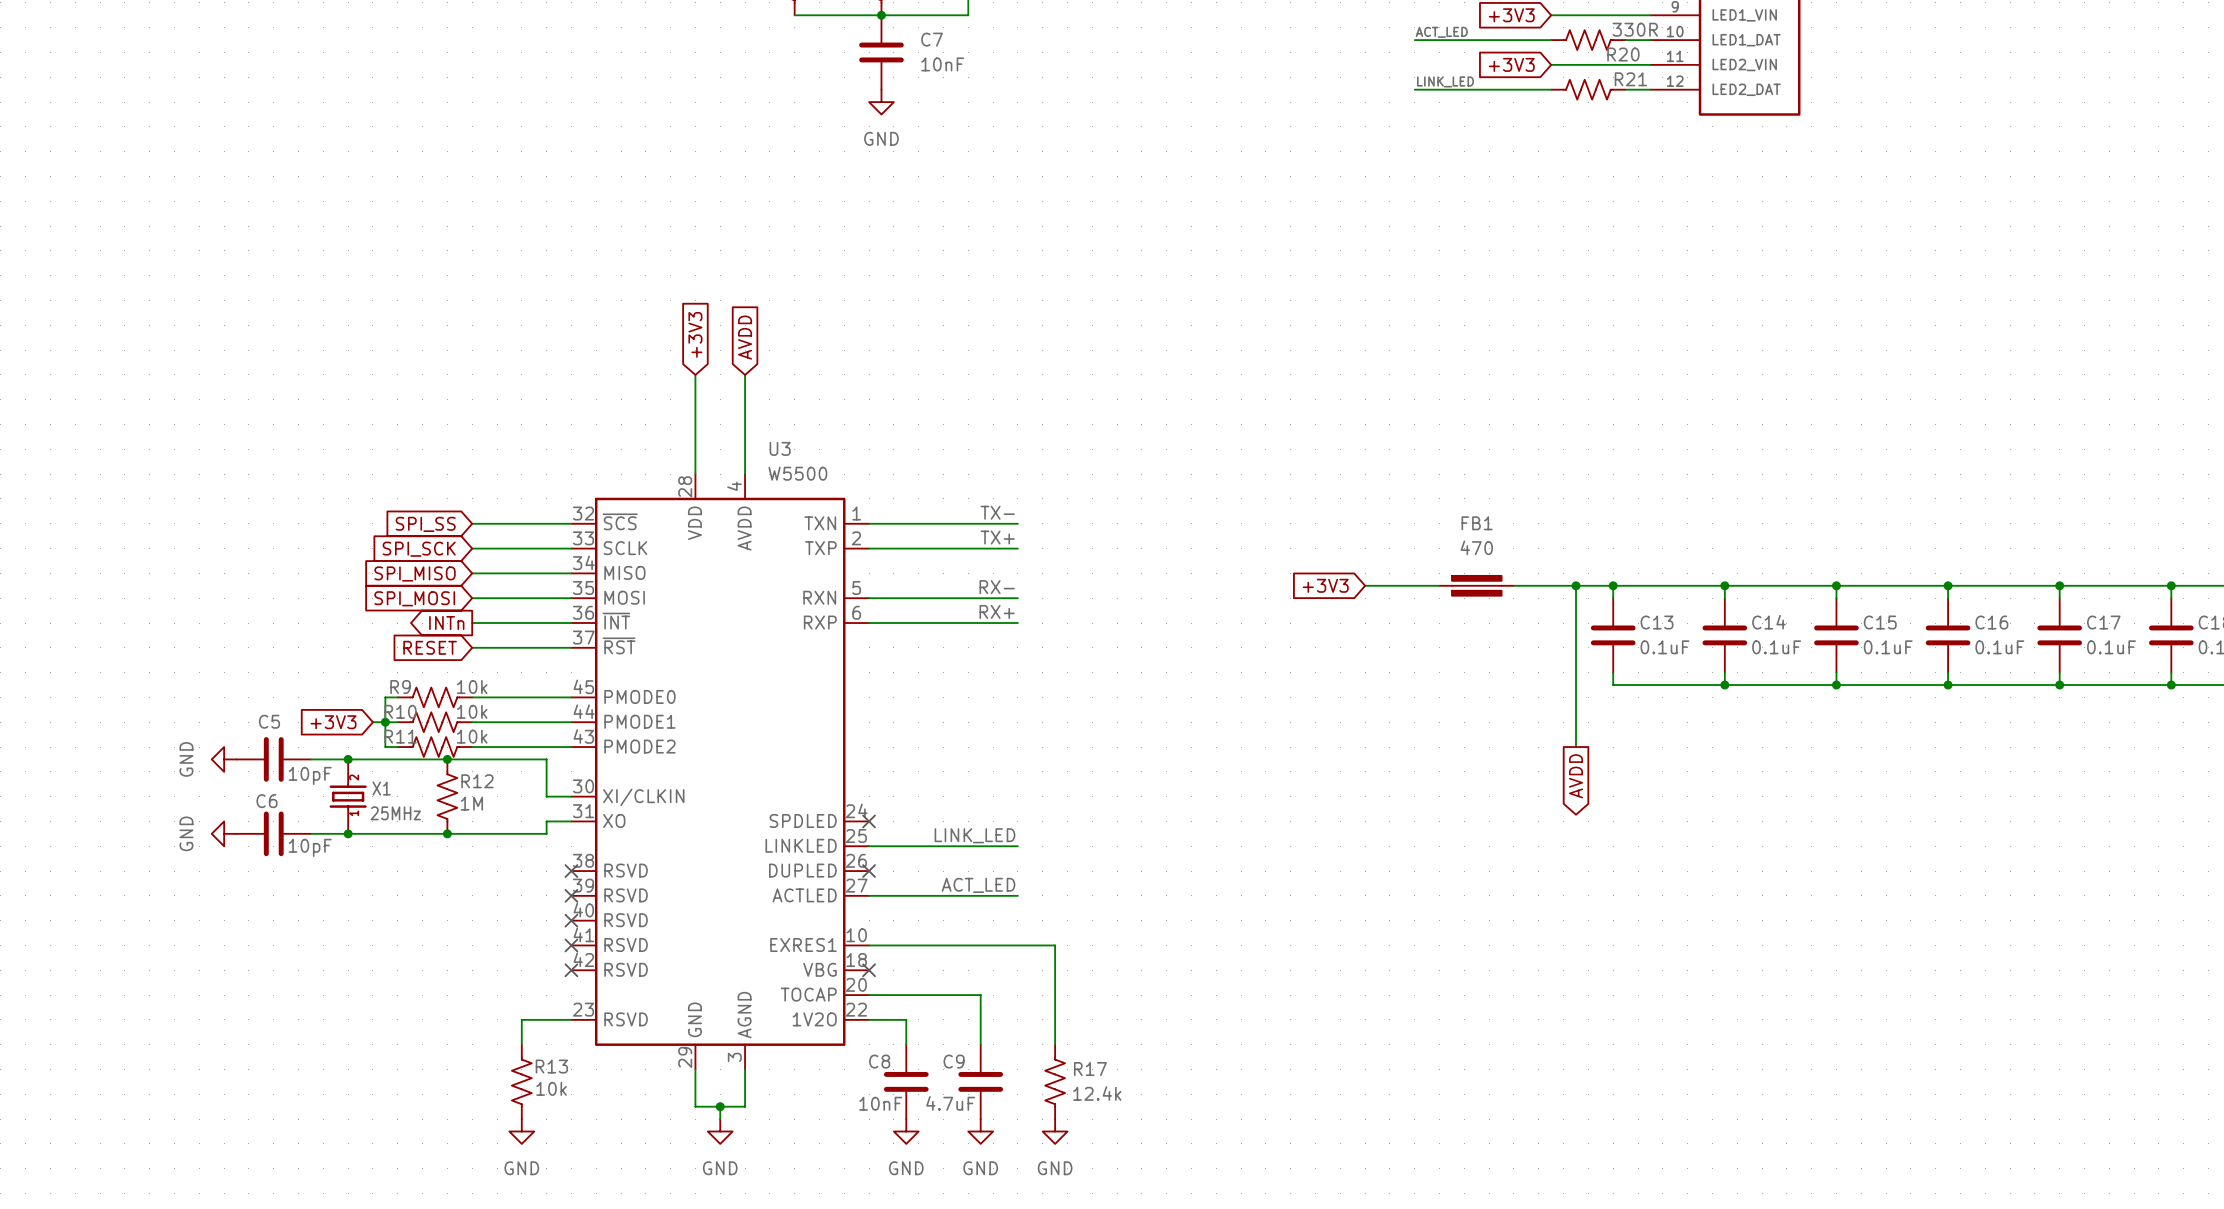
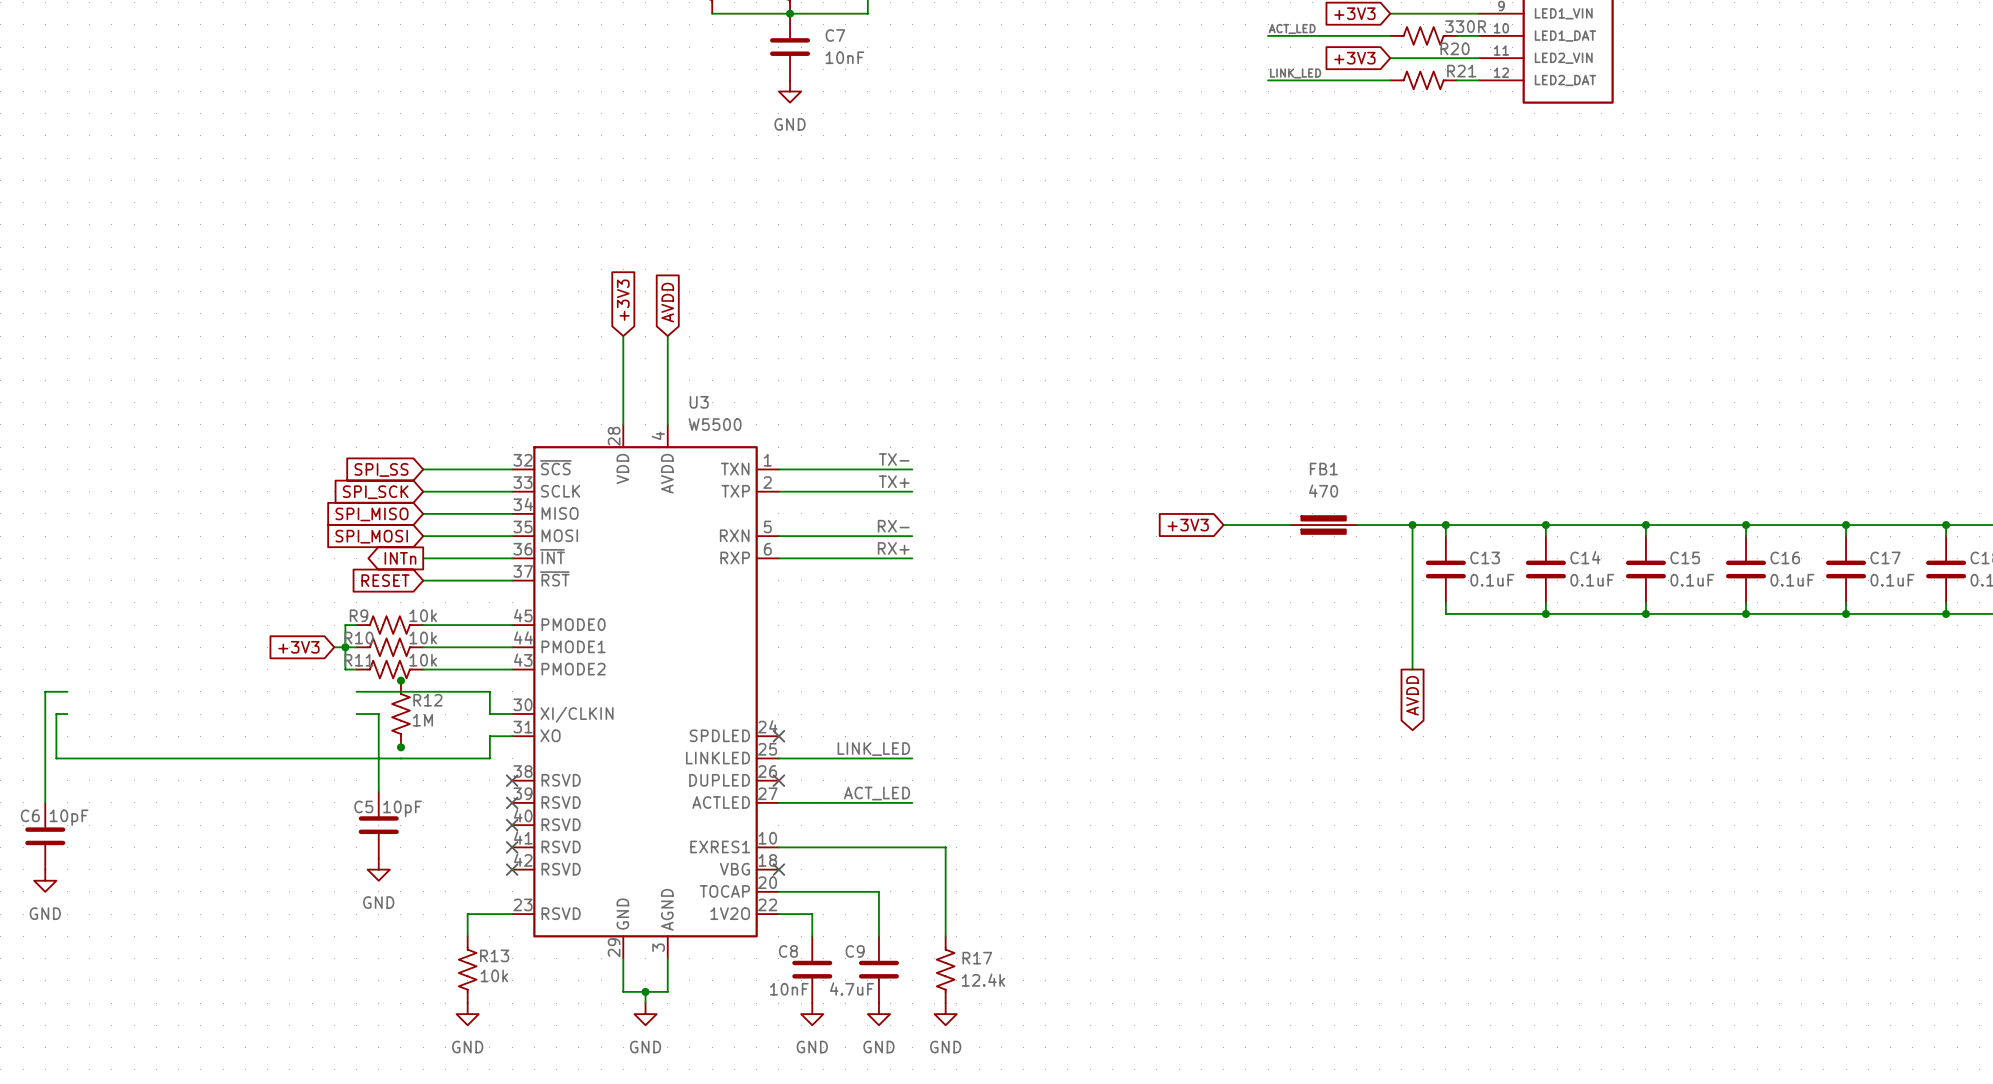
C5 name position: C5 (269, 721) -> C5 (363, 806)
power symbol: GND (224, 759) -> none
C5 rotation: 0° (273, 759) -> 90° clockwise (378, 825)
C5 position: (273, 759) -> (378, 825)
wire: (310, 759) (546, 759) (546, 771) -> (356, 691) (489, 691)
junction: (348, 759) -> none
wire: none -> (67, 691) (45, 691) (45, 802)
C5 value position: 10pF (310, 775) -> 10pF (402, 808)
X1: 25MHz (348, 796) -> none
wire: none -> (356, 714) (378, 714) (378, 791)
power symbol: GND (224, 833) -> none
C6 rotation: 0° (273, 833) -> 90° clockwise (45, 836)
C6 position: (273, 833) -> (45, 836)
wire: (310, 833) (546, 833) -> (67, 714) (56, 714) (56, 758) (489, 758) (489, 747)
junction: (348, 833) -> none
C6 value position: 10pF (310, 847) -> 10pF (69, 817)
power symbol: none -> GND (378, 869)
power symbol: none -> GND (45, 880)

